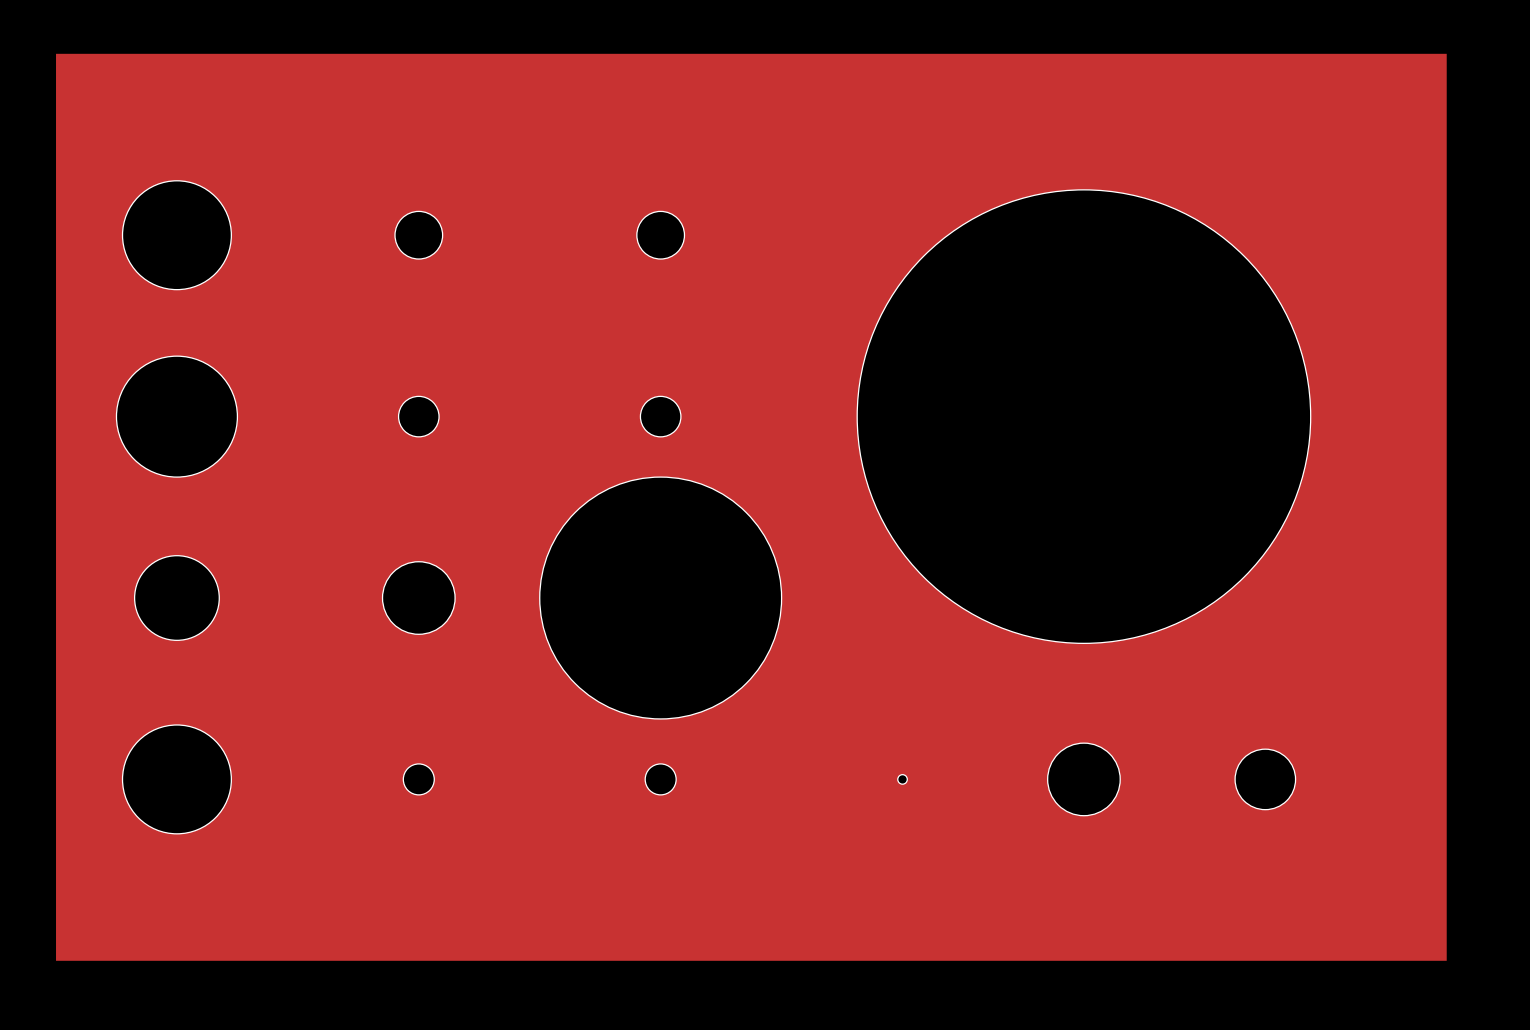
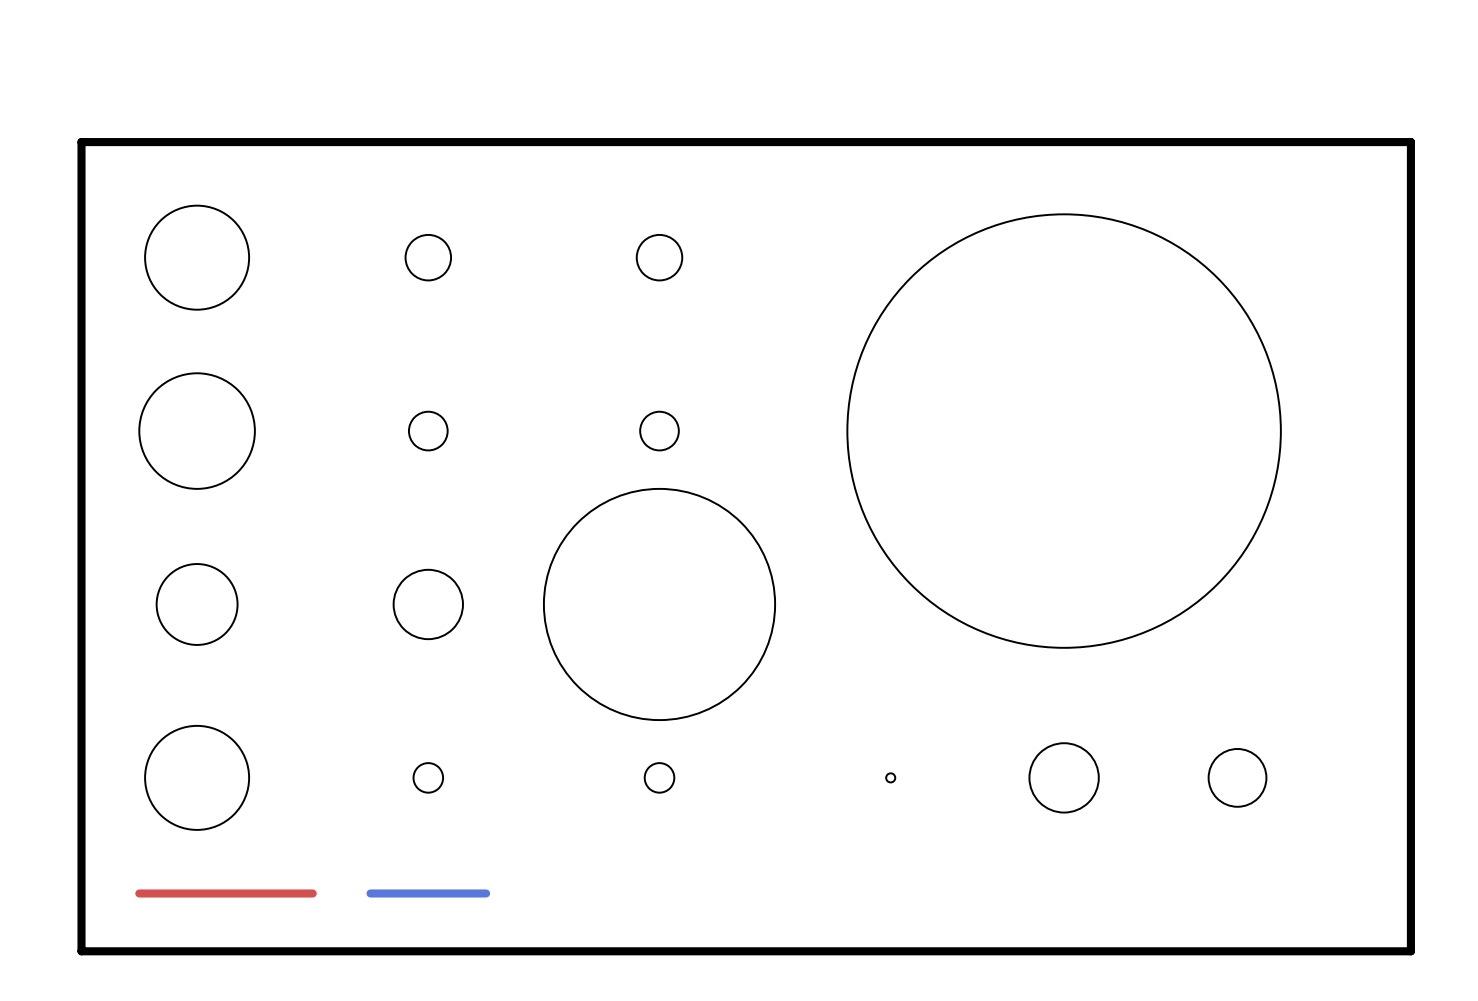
drawing: [56, 53, 1447, 961] -> none
board edge: none -> (81, 142) (81, 951) (1410, 951) (1410, 142) (81, 142)
top track: none -> (139, 893) (312, 893)
bottom track: none -> (370, 893) (486, 893)

